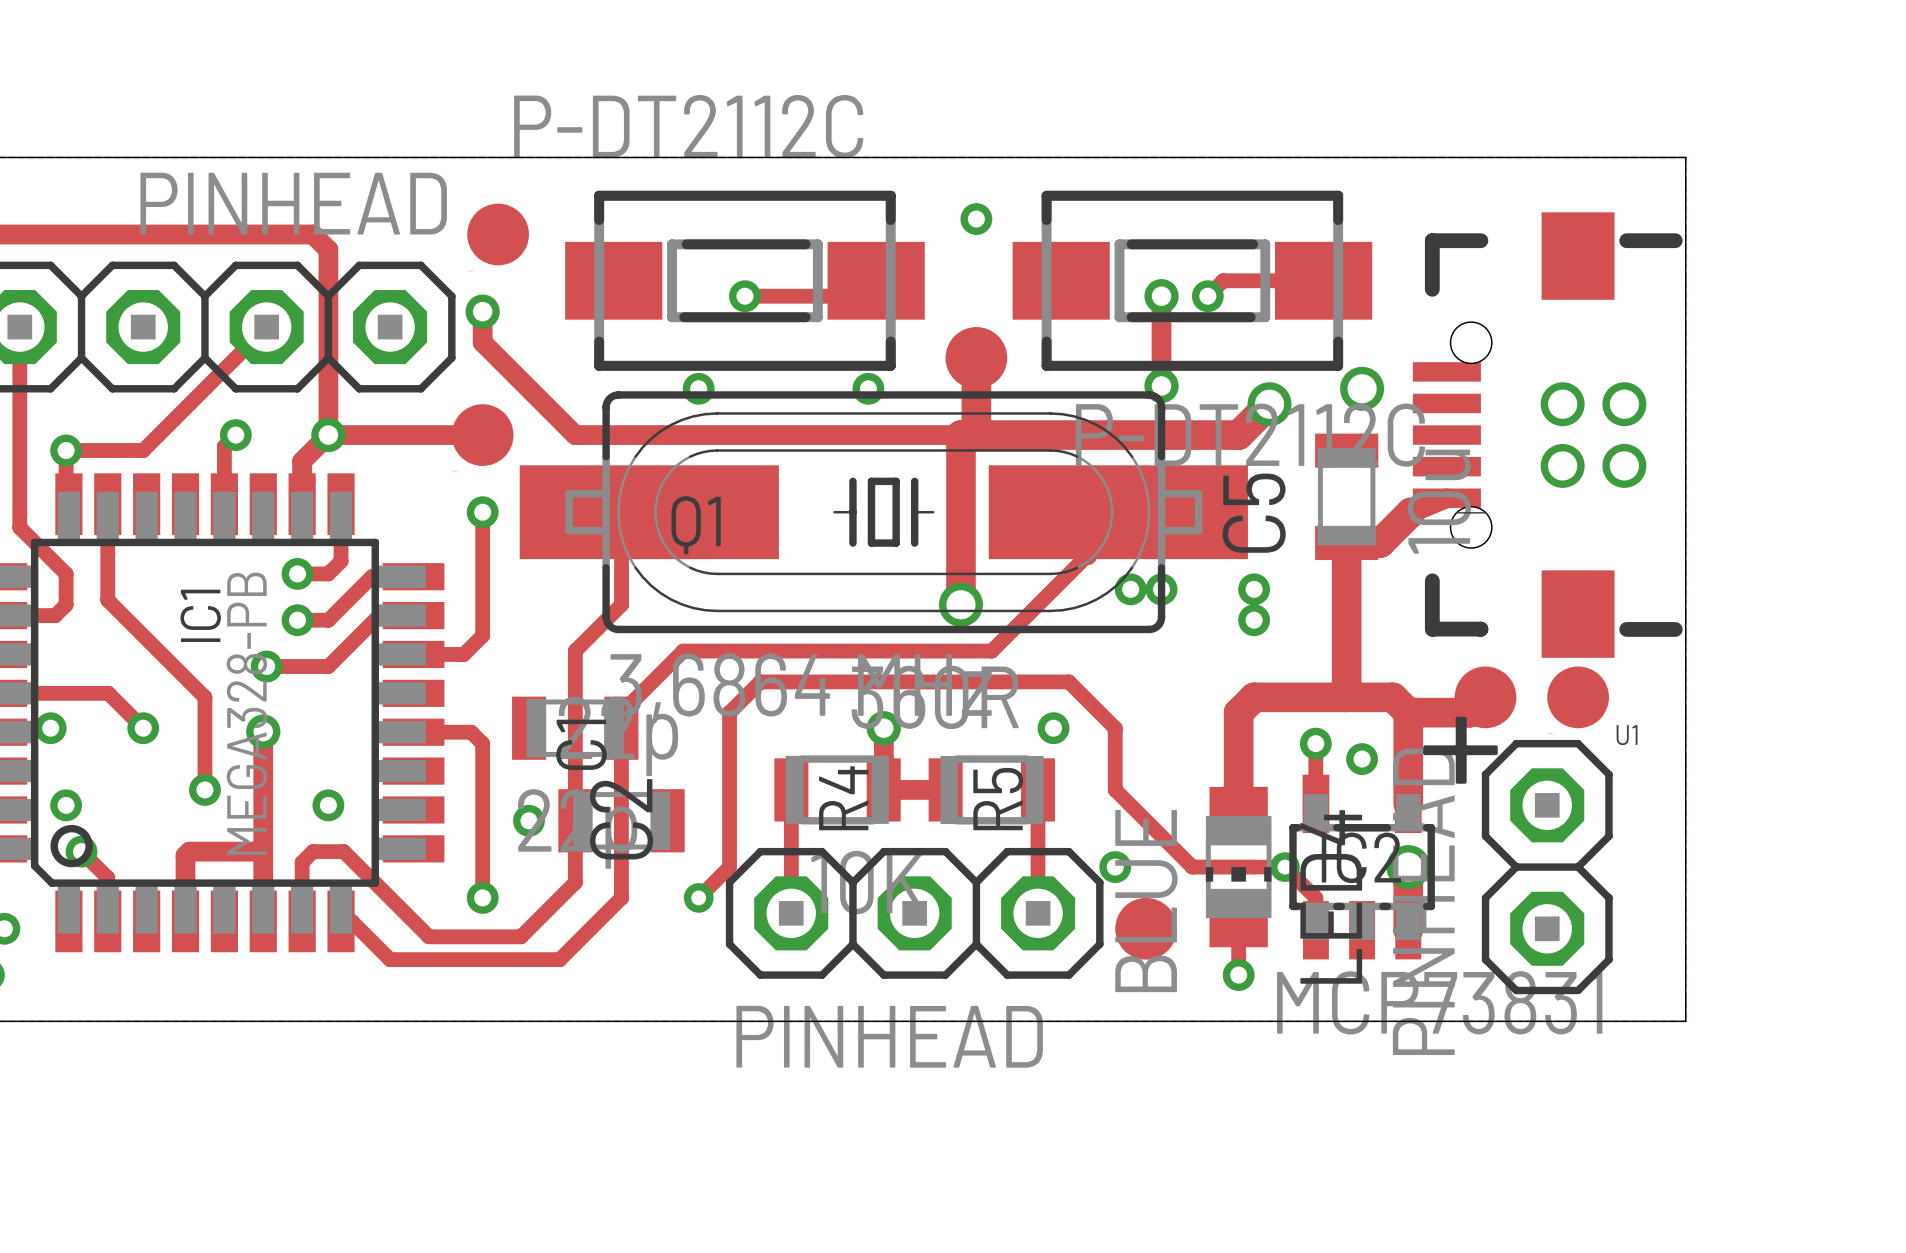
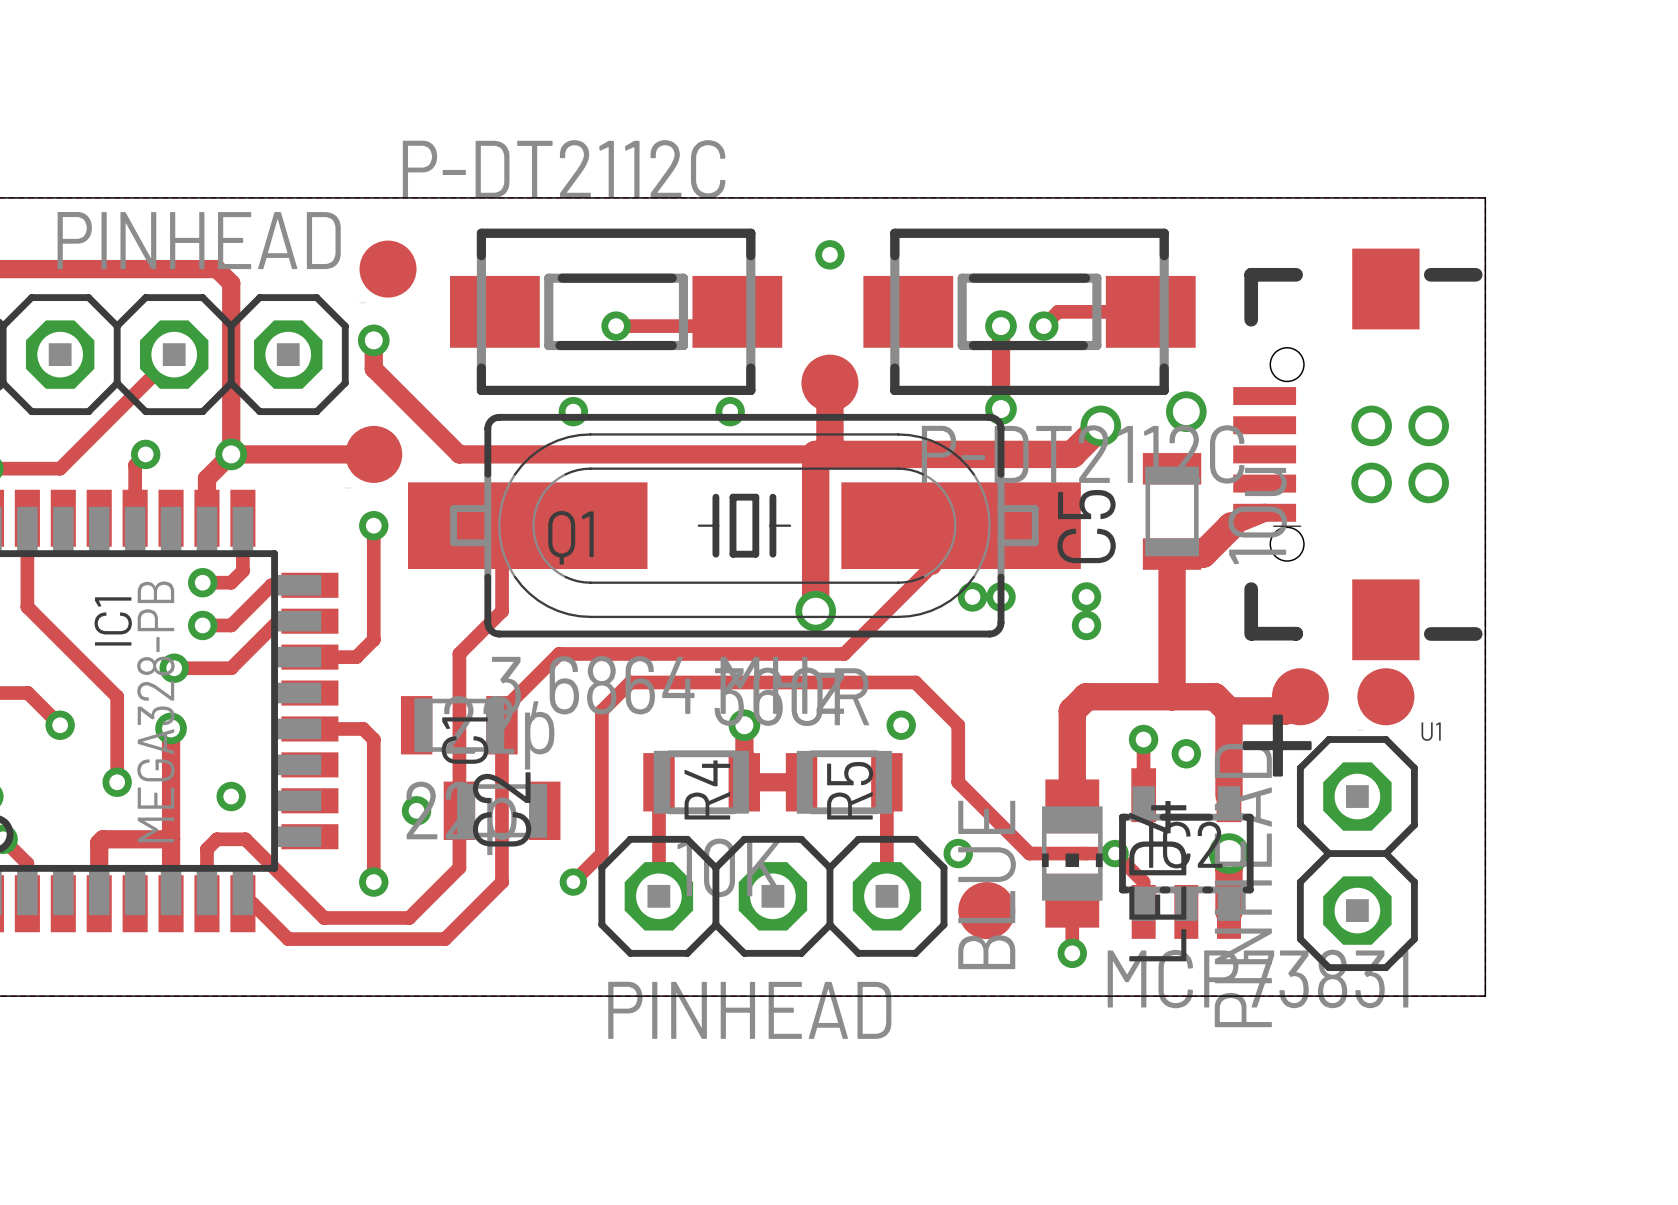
U1 footprint: [1412, 212, 1683, 658] -> [1233, 248, 1483, 661]

